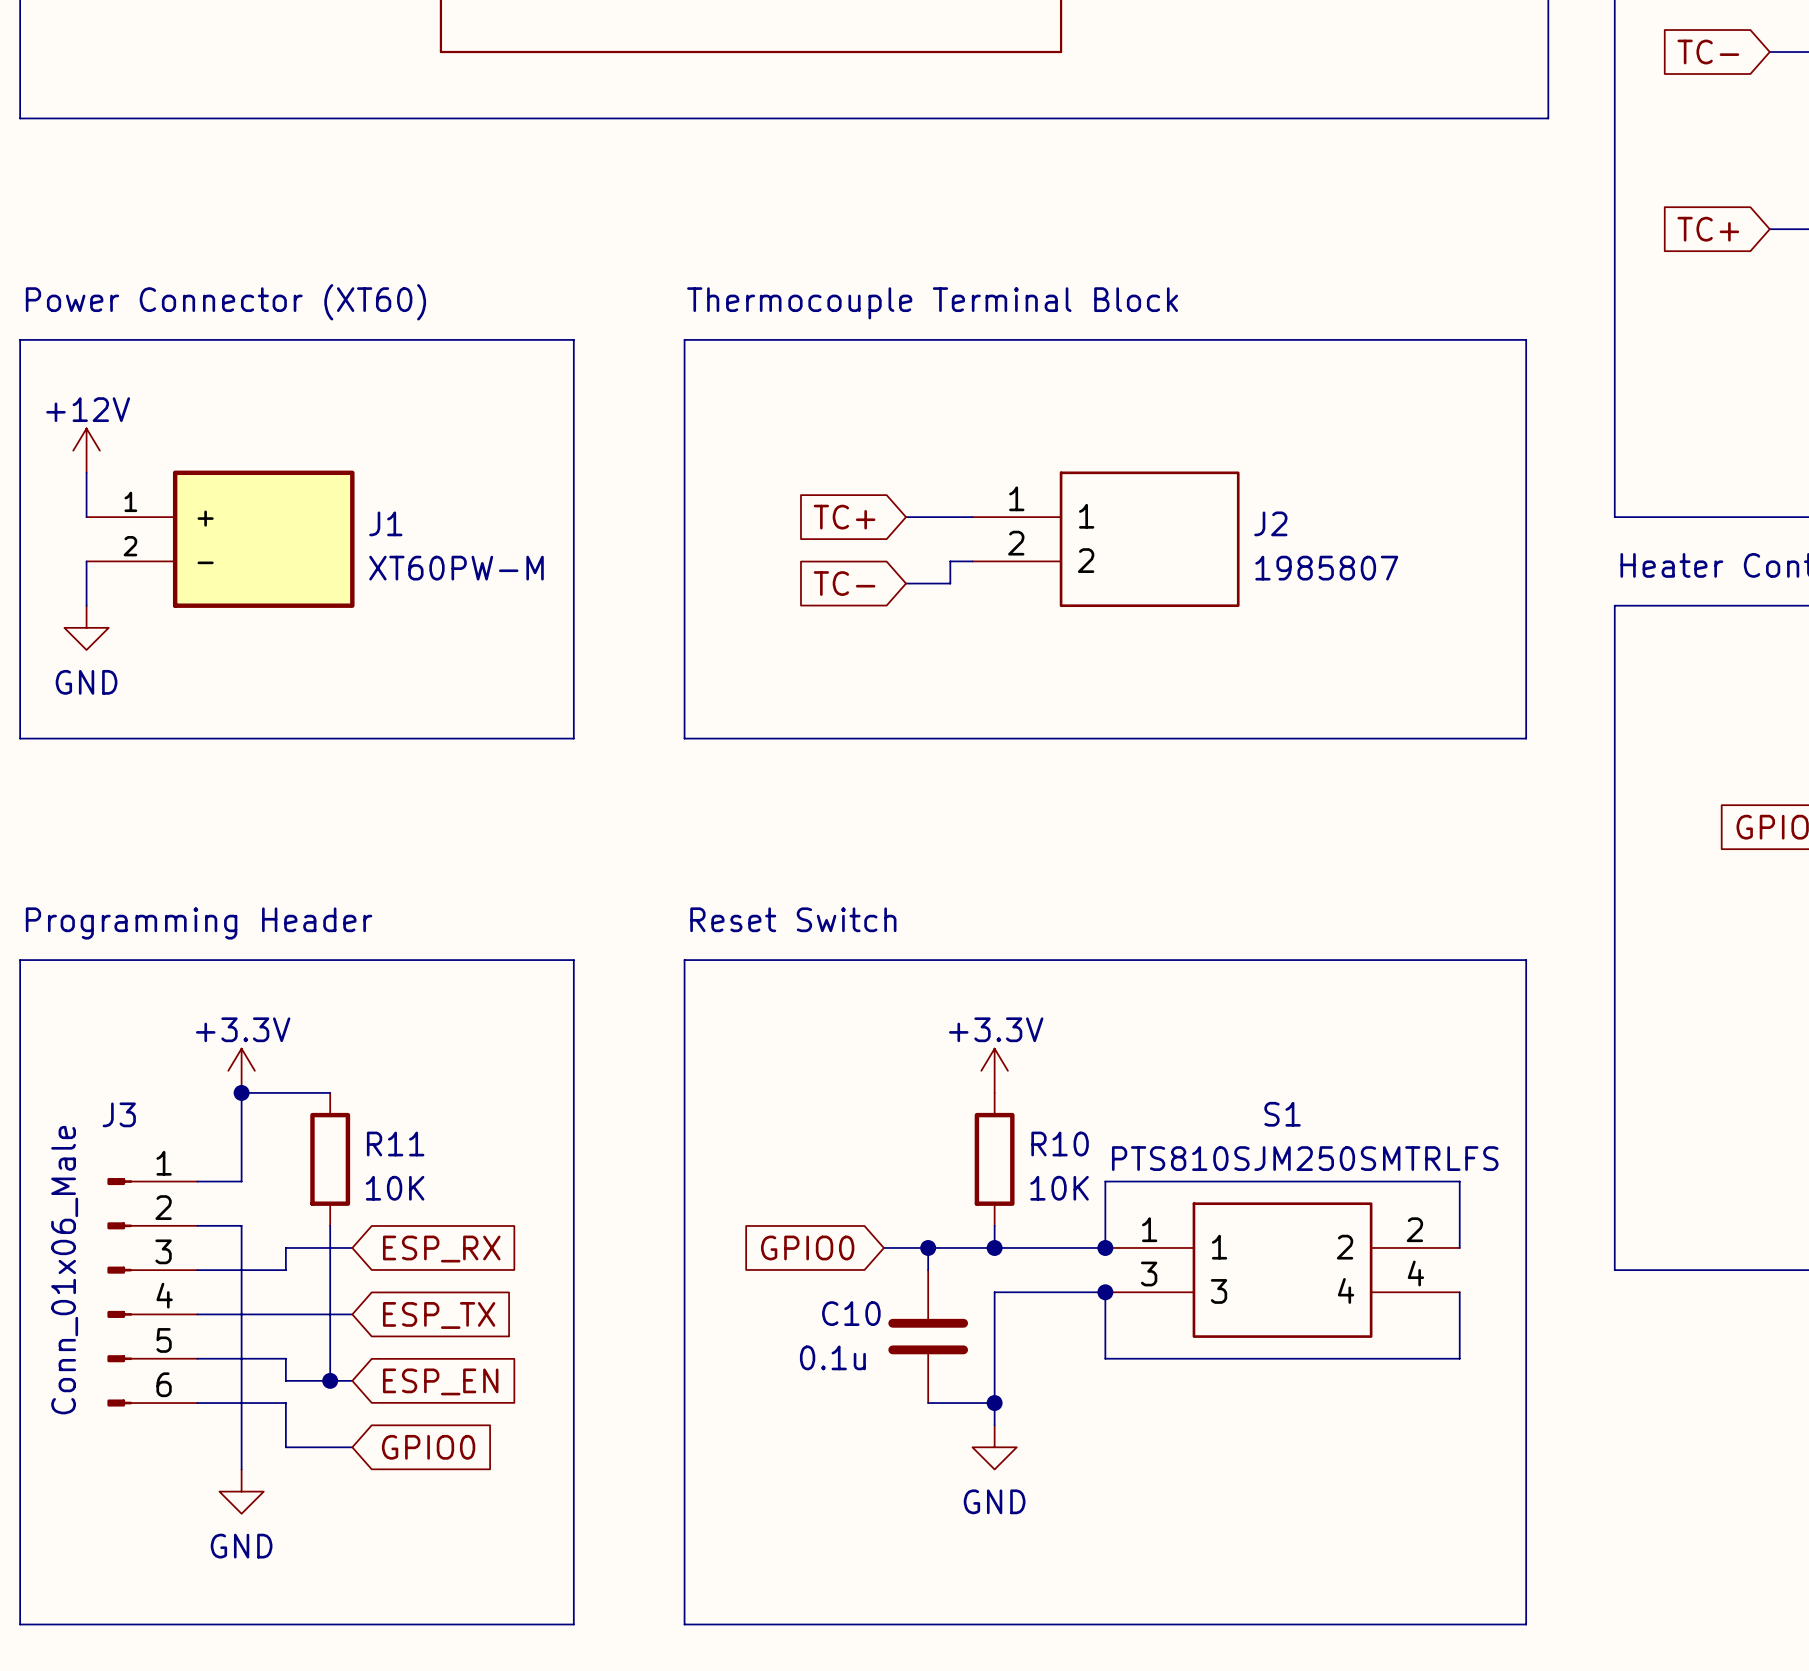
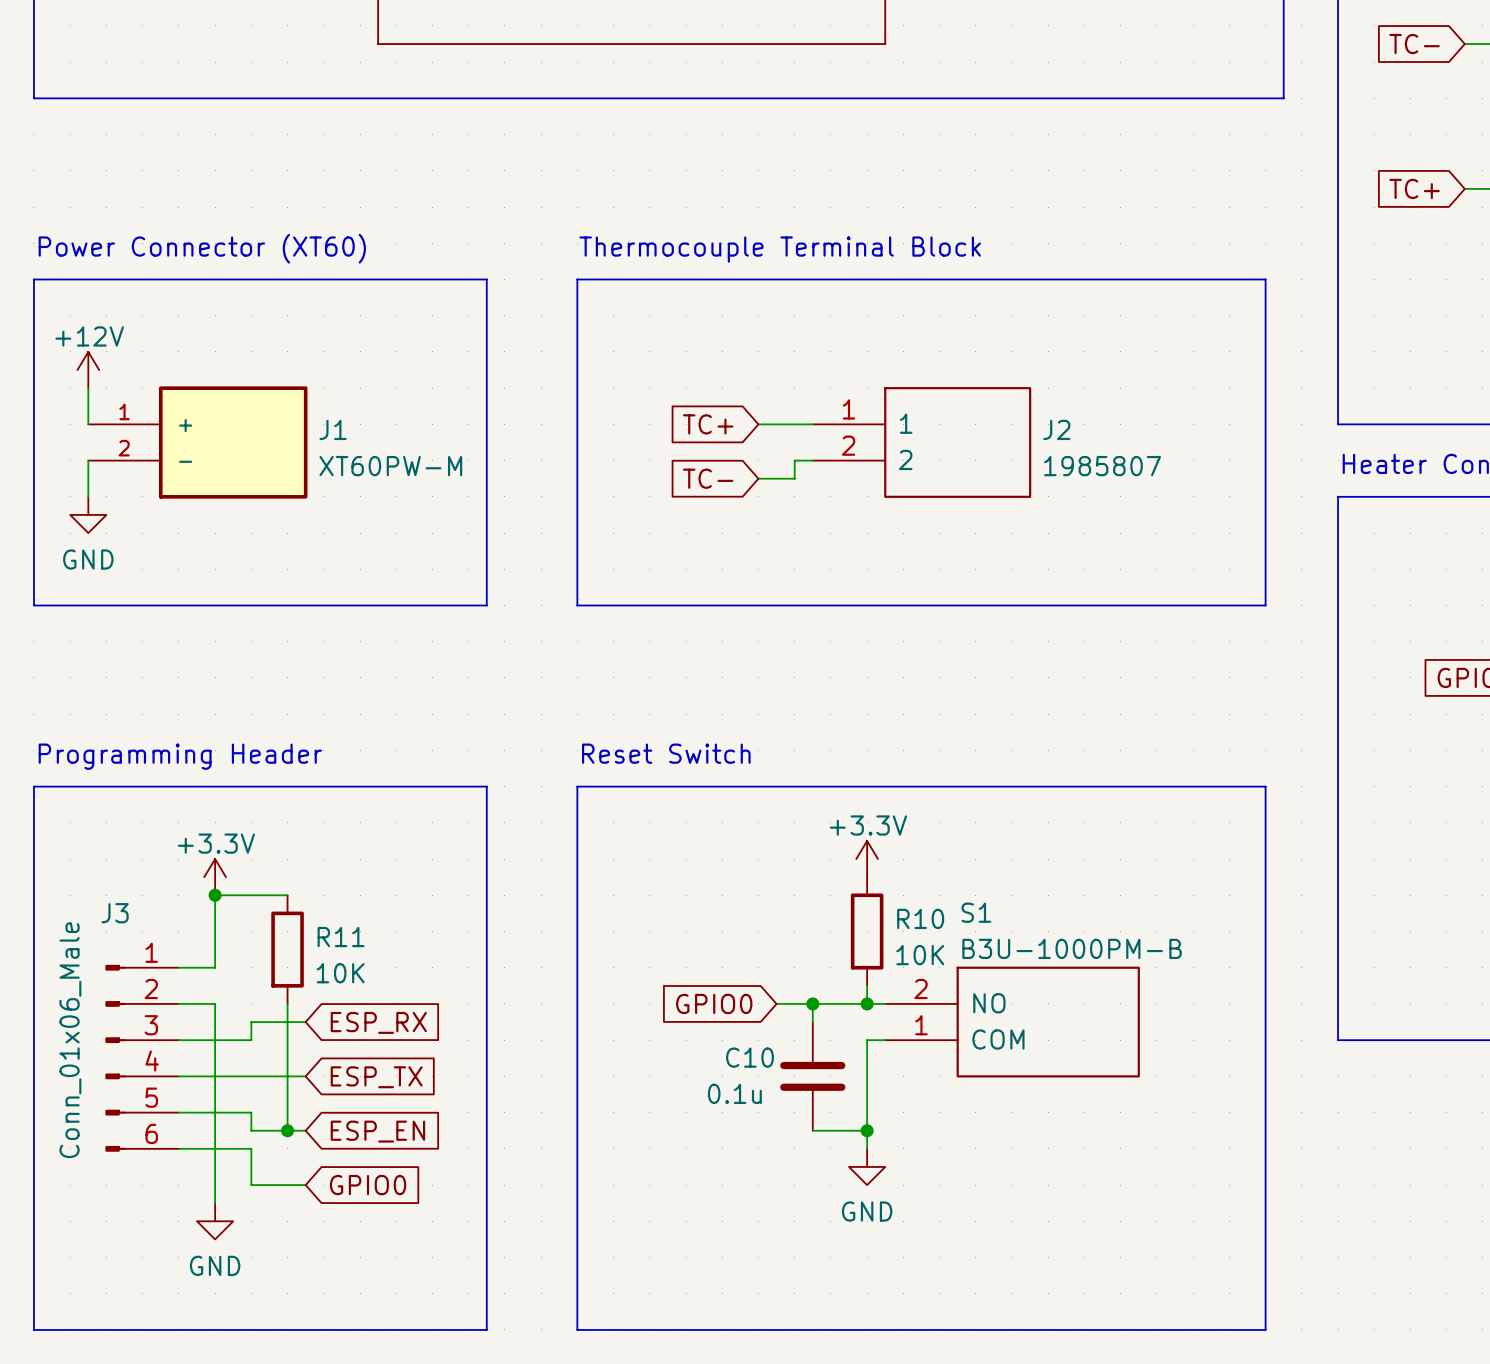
power symbol position: +3.3V (994, 1070) -> +3.3V (867, 859)
S1 name position: S1 (1282, 1114) -> S1 (976, 912)
S1 value: PTS810SJM250SMTRLFS (1305, 1158) -> B3U-1000PM-B (1072, 948)
R10 position: (994, 1159) -> (867, 931)
S1 symbol: [1105, 1202, 1460, 1338] -> [885, 966, 1140, 1078]
wire: none -> (776, 1003) (885, 1003)
junction: none -> (812, 1003)
wire: (994, 1225) (994, 1247) -> (867, 985) (867, 1003)
junction: none -> (867, 1003)
global label position: GPIO0 (807, 1247) -> GPIO0 (714, 1003)
wire: (883, 1247) (1105, 1247) (1105, 1181) (1459, 1181) (1459, 1247) -> none
wire: (928, 1247) (928, 1270) -> (812, 1003) (812, 1022)
junction: (928, 1247) -> none
junction: (994, 1247) -> none
junction: (1105, 1247) -> none
wire: none -> (885, 1040) (867, 1040) (867, 1148)
junction: (1105, 1292) -> none
wire: (1459, 1292) (1459, 1358) (1105, 1358) (1105, 1292) (994, 1292) (994, 1425) -> none
C10 position: (928, 1336) -> (812, 1076)
wire: (928, 1403) (994, 1403) -> (812, 1130) (867, 1130)
junction position: (994, 1403) -> (867, 1130)
power symbol position: GND (994, 1447) -> GND (867, 1166)

